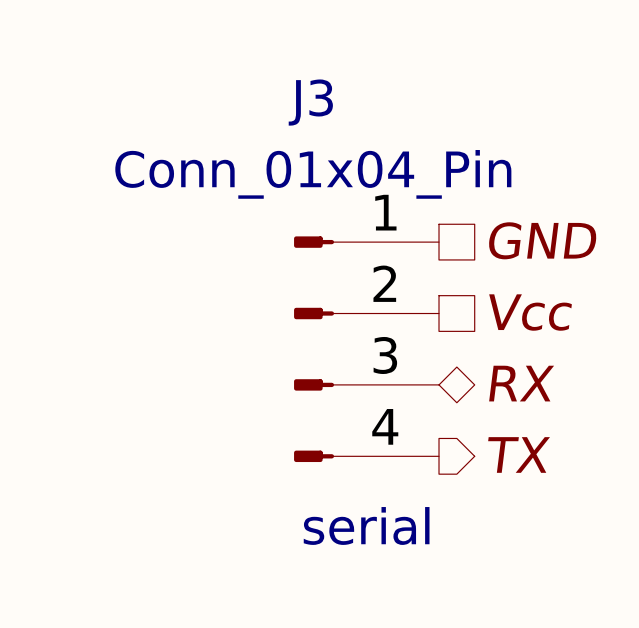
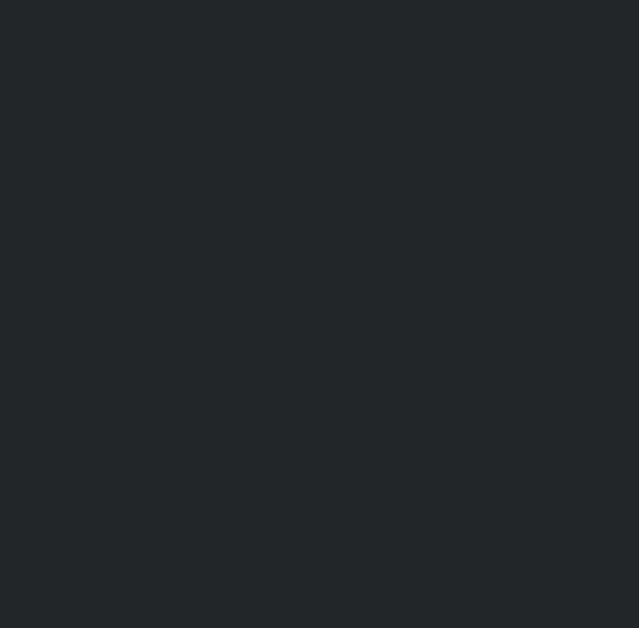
hierarchical label: GND (542, 240) -> none
hierarchical label: Vcc (530, 312) -> none
J3: Conn_01x04_Pin (366, 349) -> none
hierarchical label: RX (521, 383) -> none
hierarchical label: TX (519, 454) -> none

